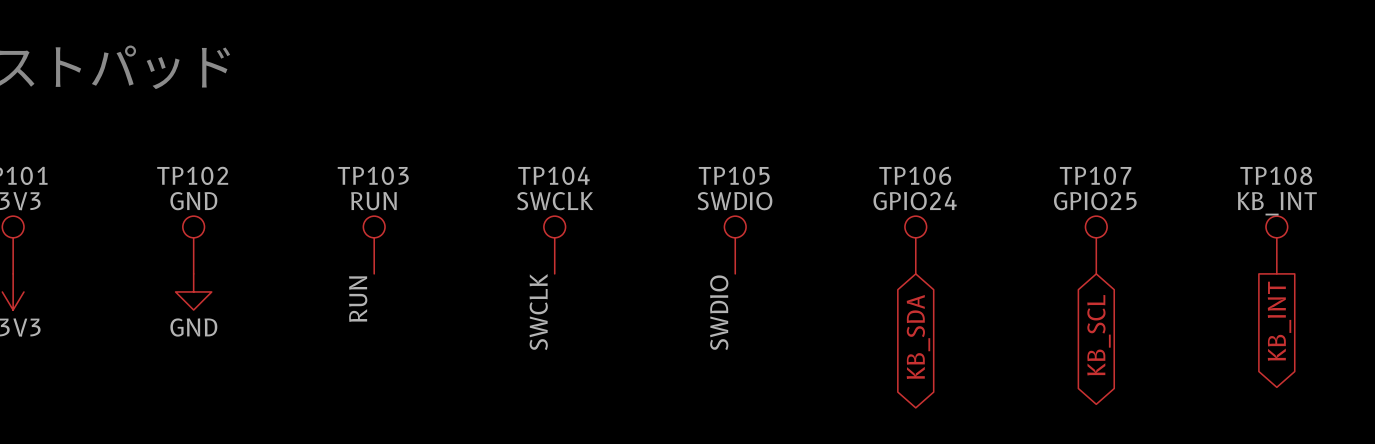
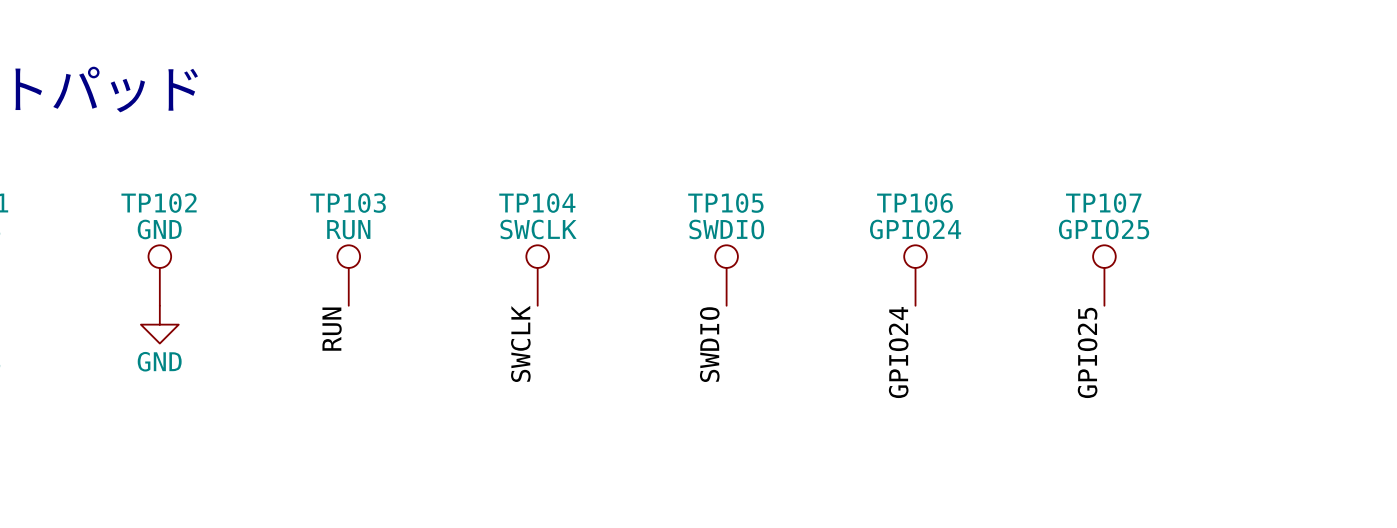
TP108: KB_INT (1276, 245) -> none
label: none -> GPIO24 (898, 352)
label: none -> GPIO25 (1087, 352)
global label: KB_INT (1279, 321) -> none
global label: KB_SCL (1099, 335) -> none
global label: KB_SDA (918, 337) -> none

